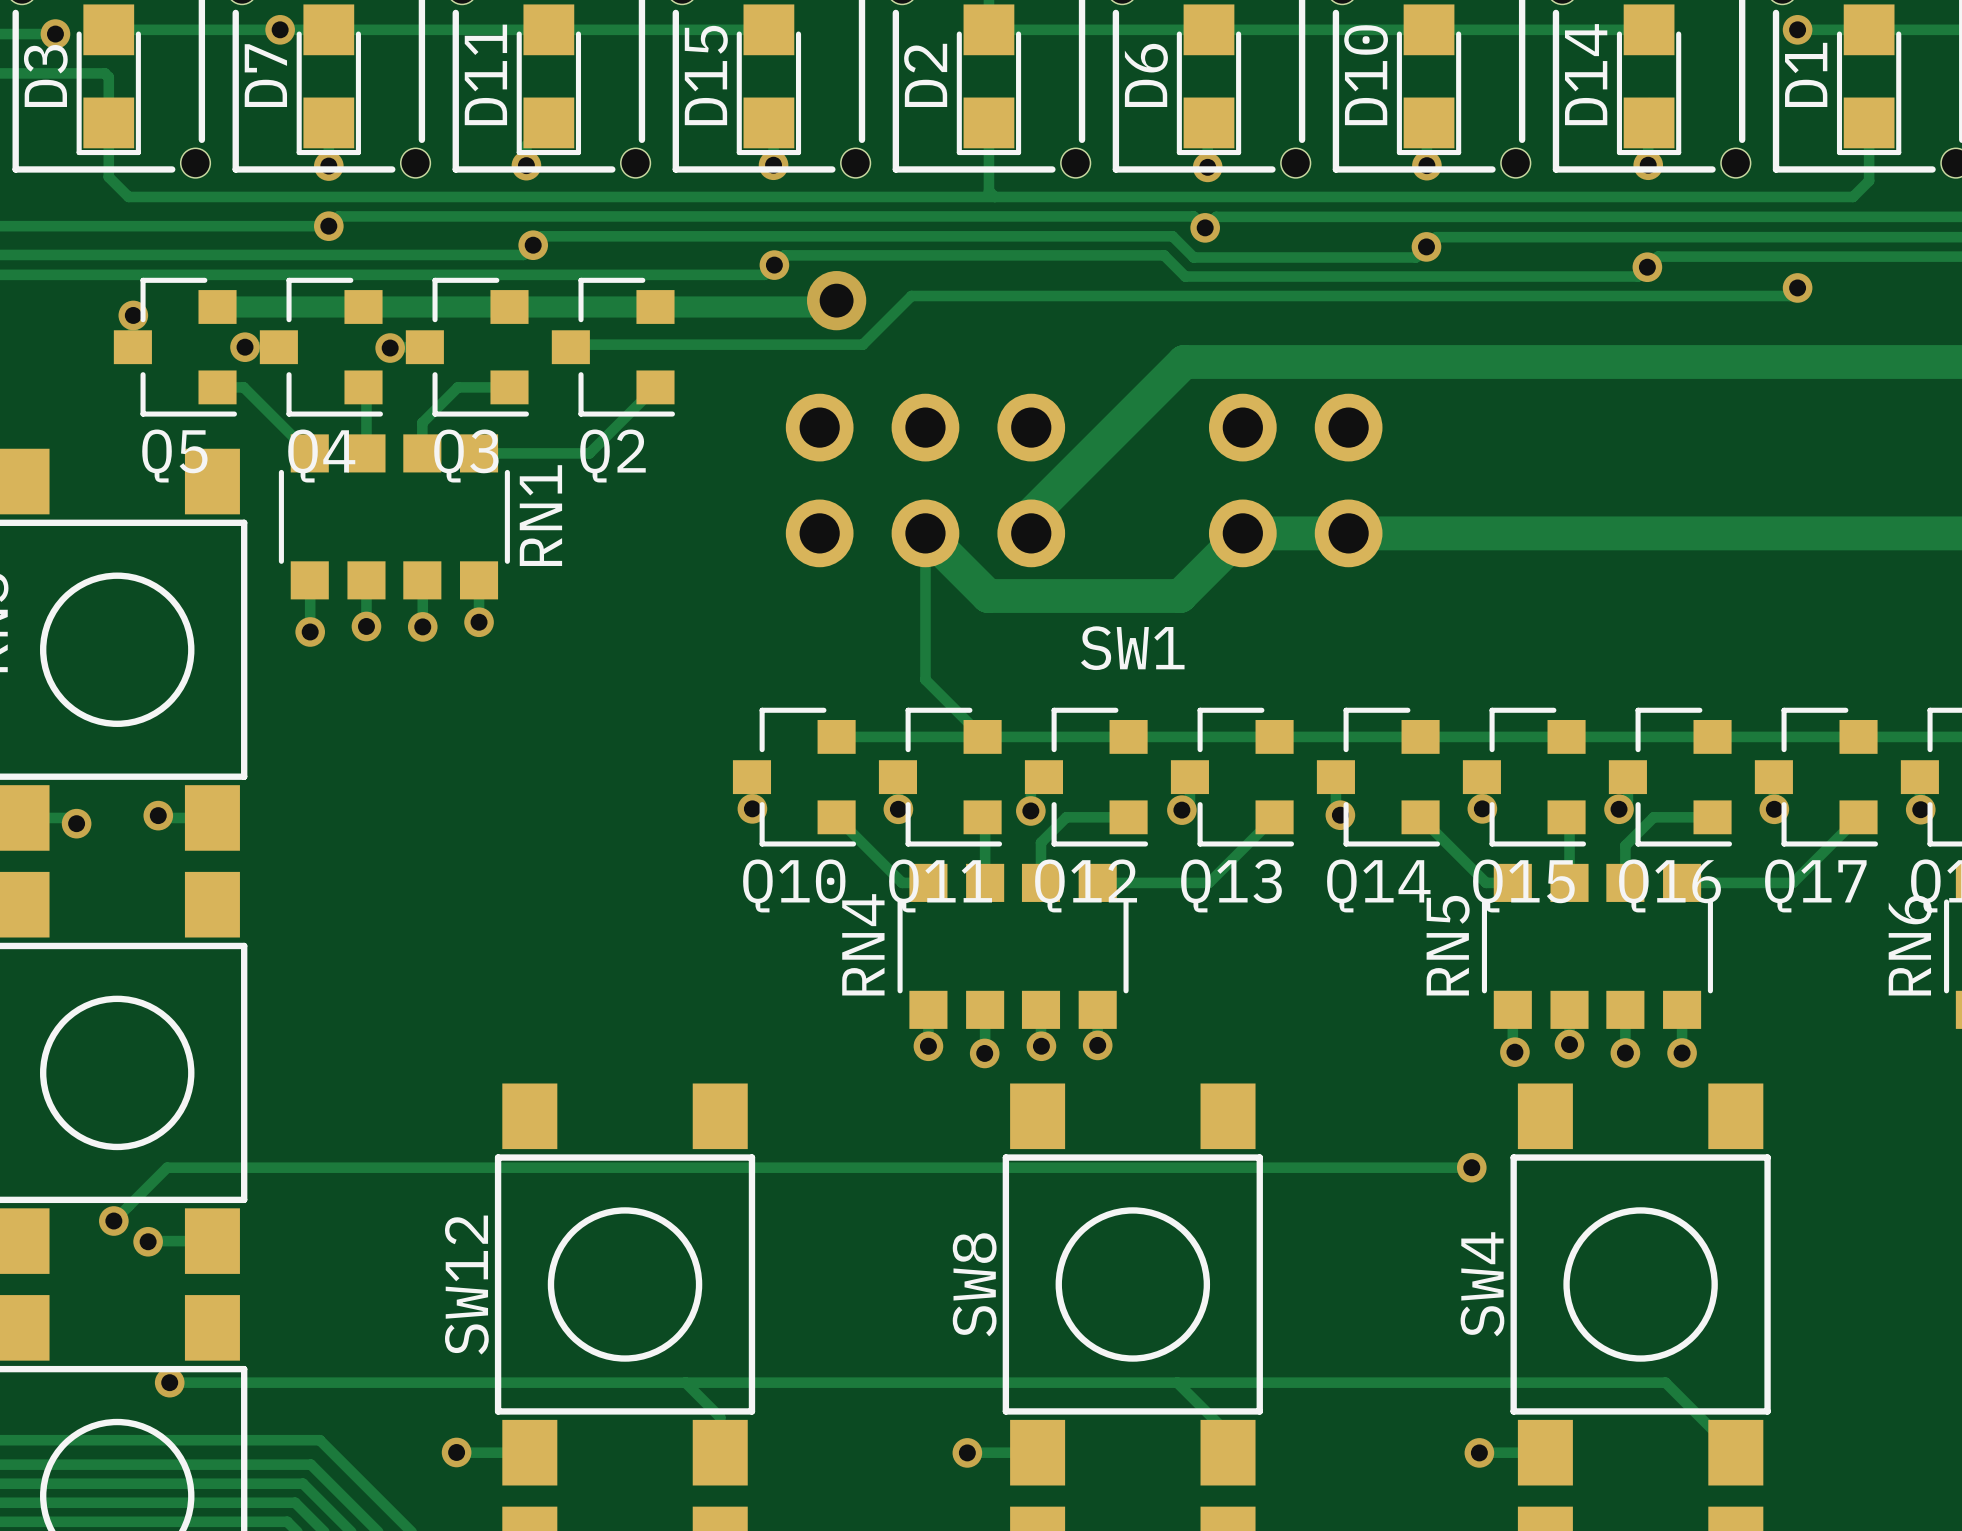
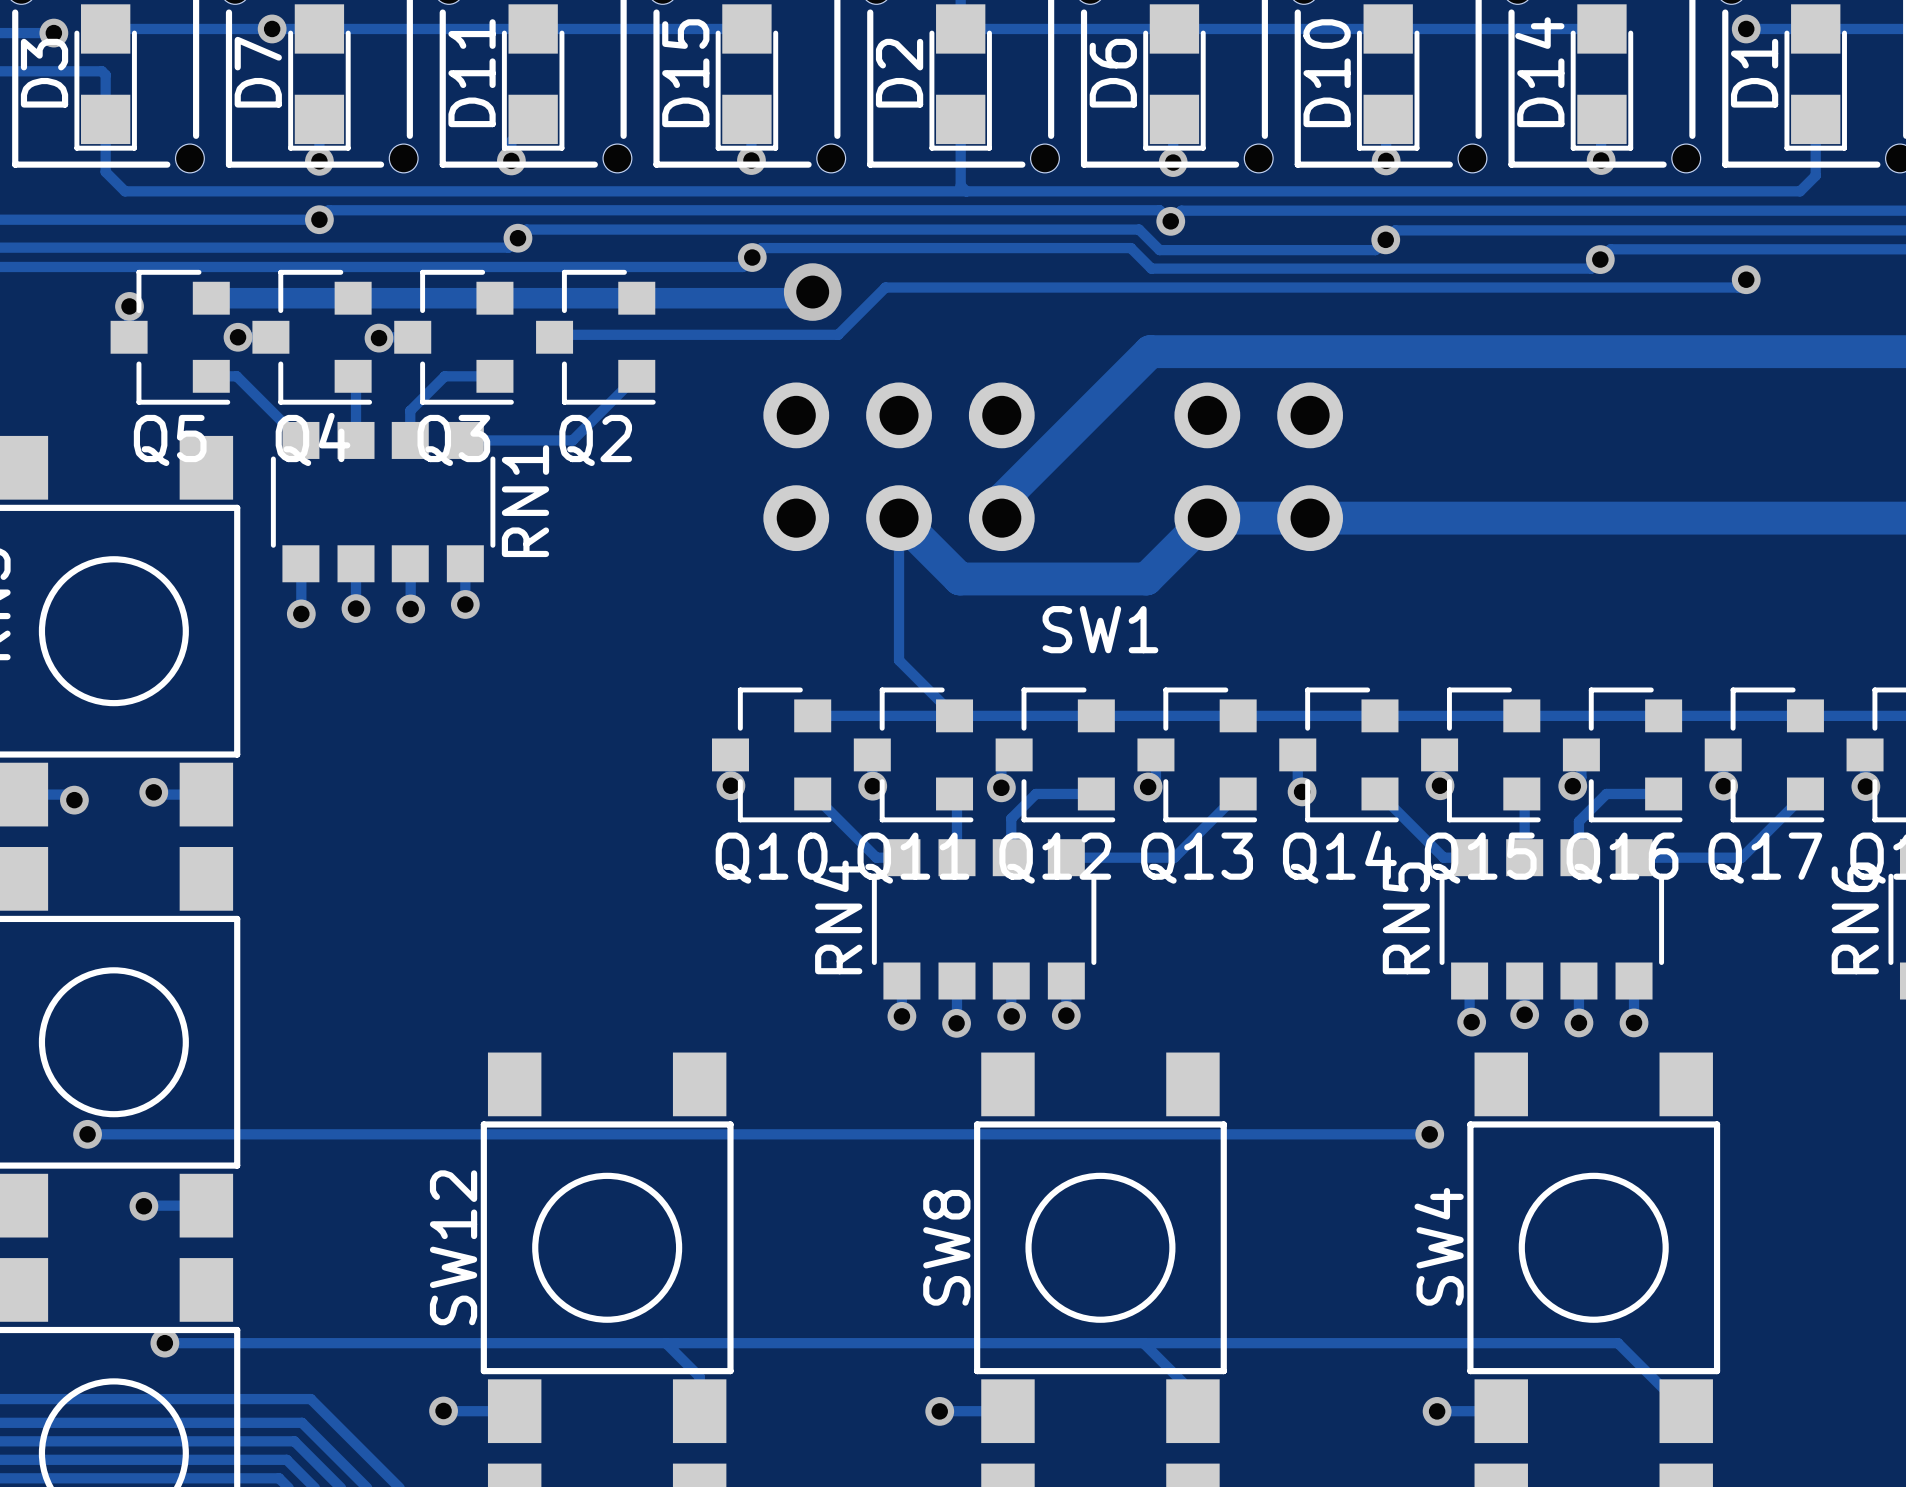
track: (167, 1167) (113, 1221) -> (162, 1134) (87, 1134)
via position: (113, 1221) -> (87, 1134)

